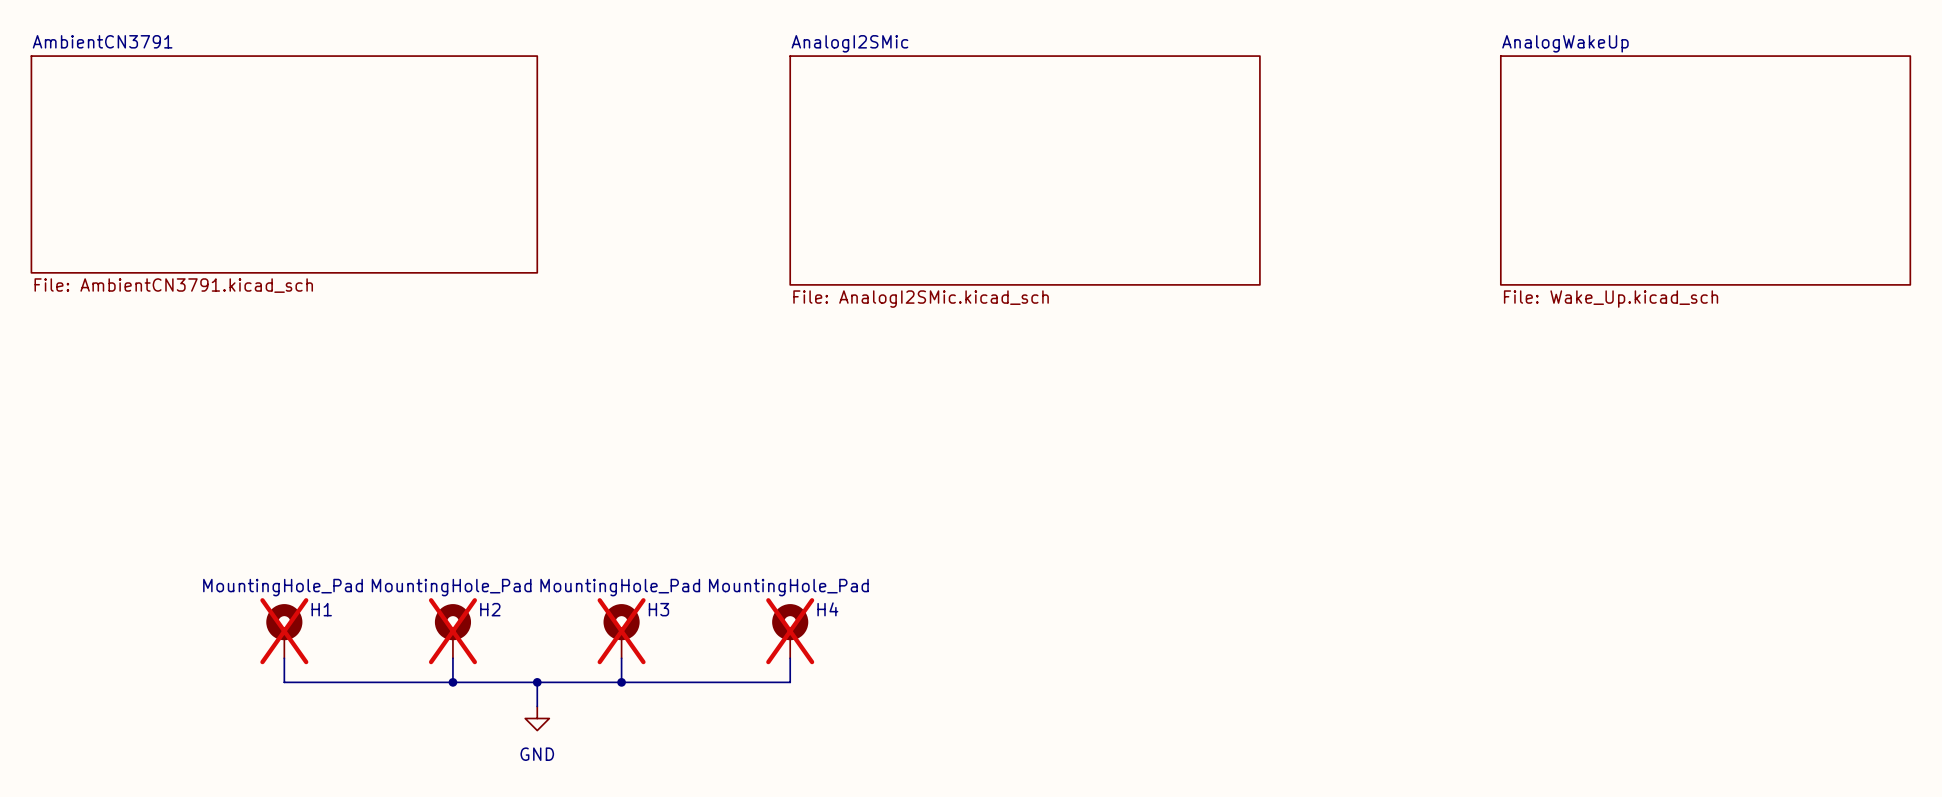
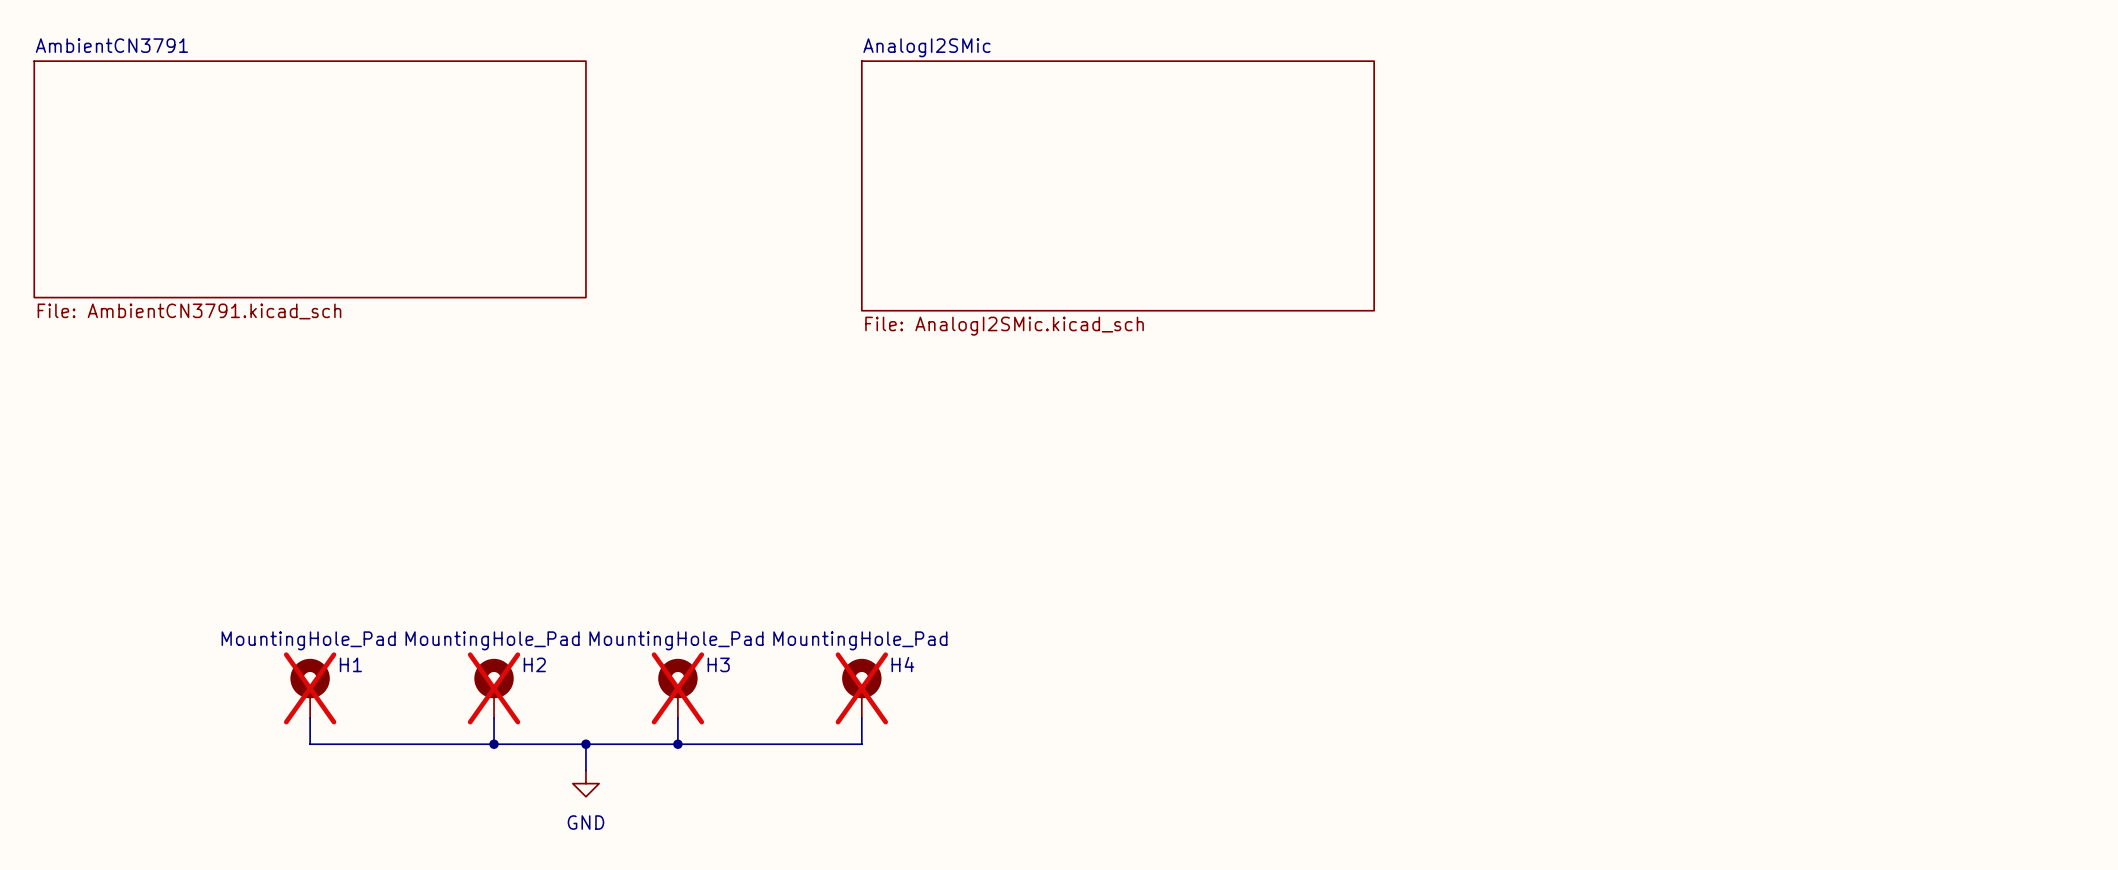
sheet AnalogWakeUp: File: Wake_Up.kicad_sch (1705, 170) -> none

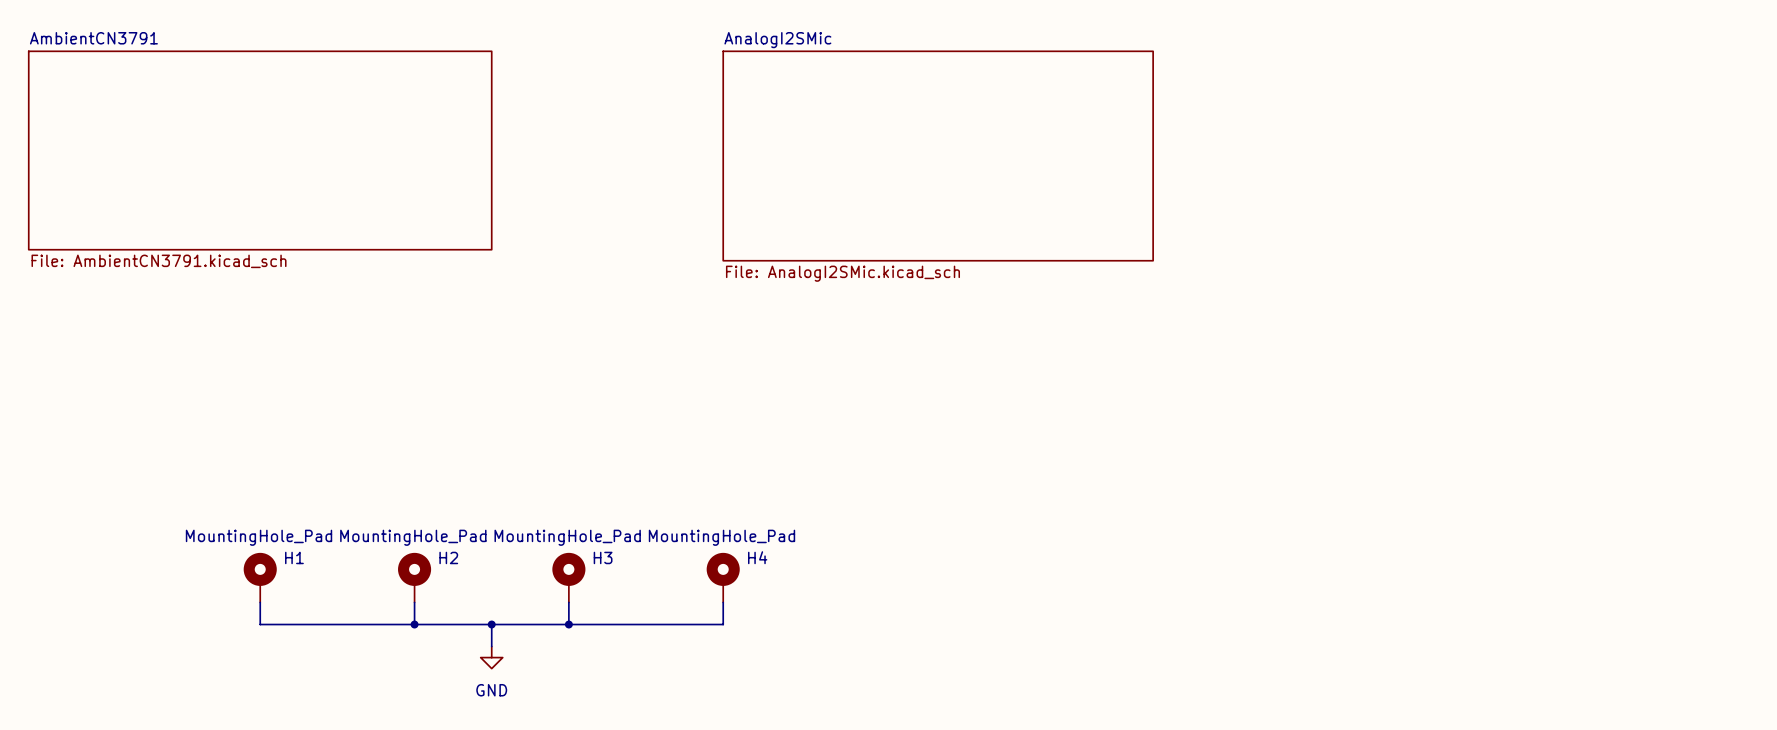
H1 do-not-place cross: (310, 688) -> none
H2 do-not-place cross: (494, 688) -> none
H3 do-not-place cross: (677, 688) -> none
H4 do-not-place cross: (861, 688) -> none

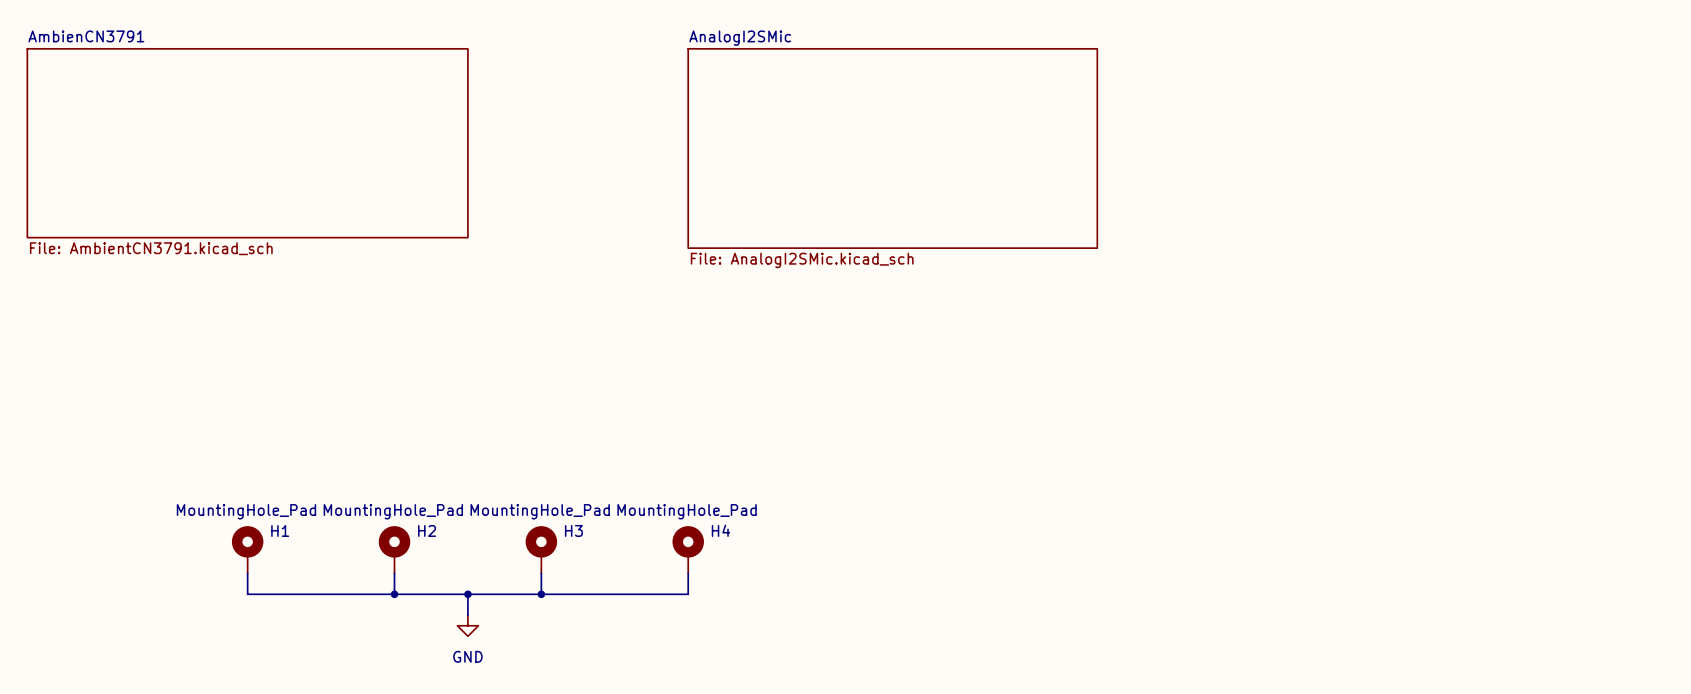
sheet AmbientCN3791 name: AmbientCN3791 (93, 38) -> AmbienCN3791 (86, 36)

